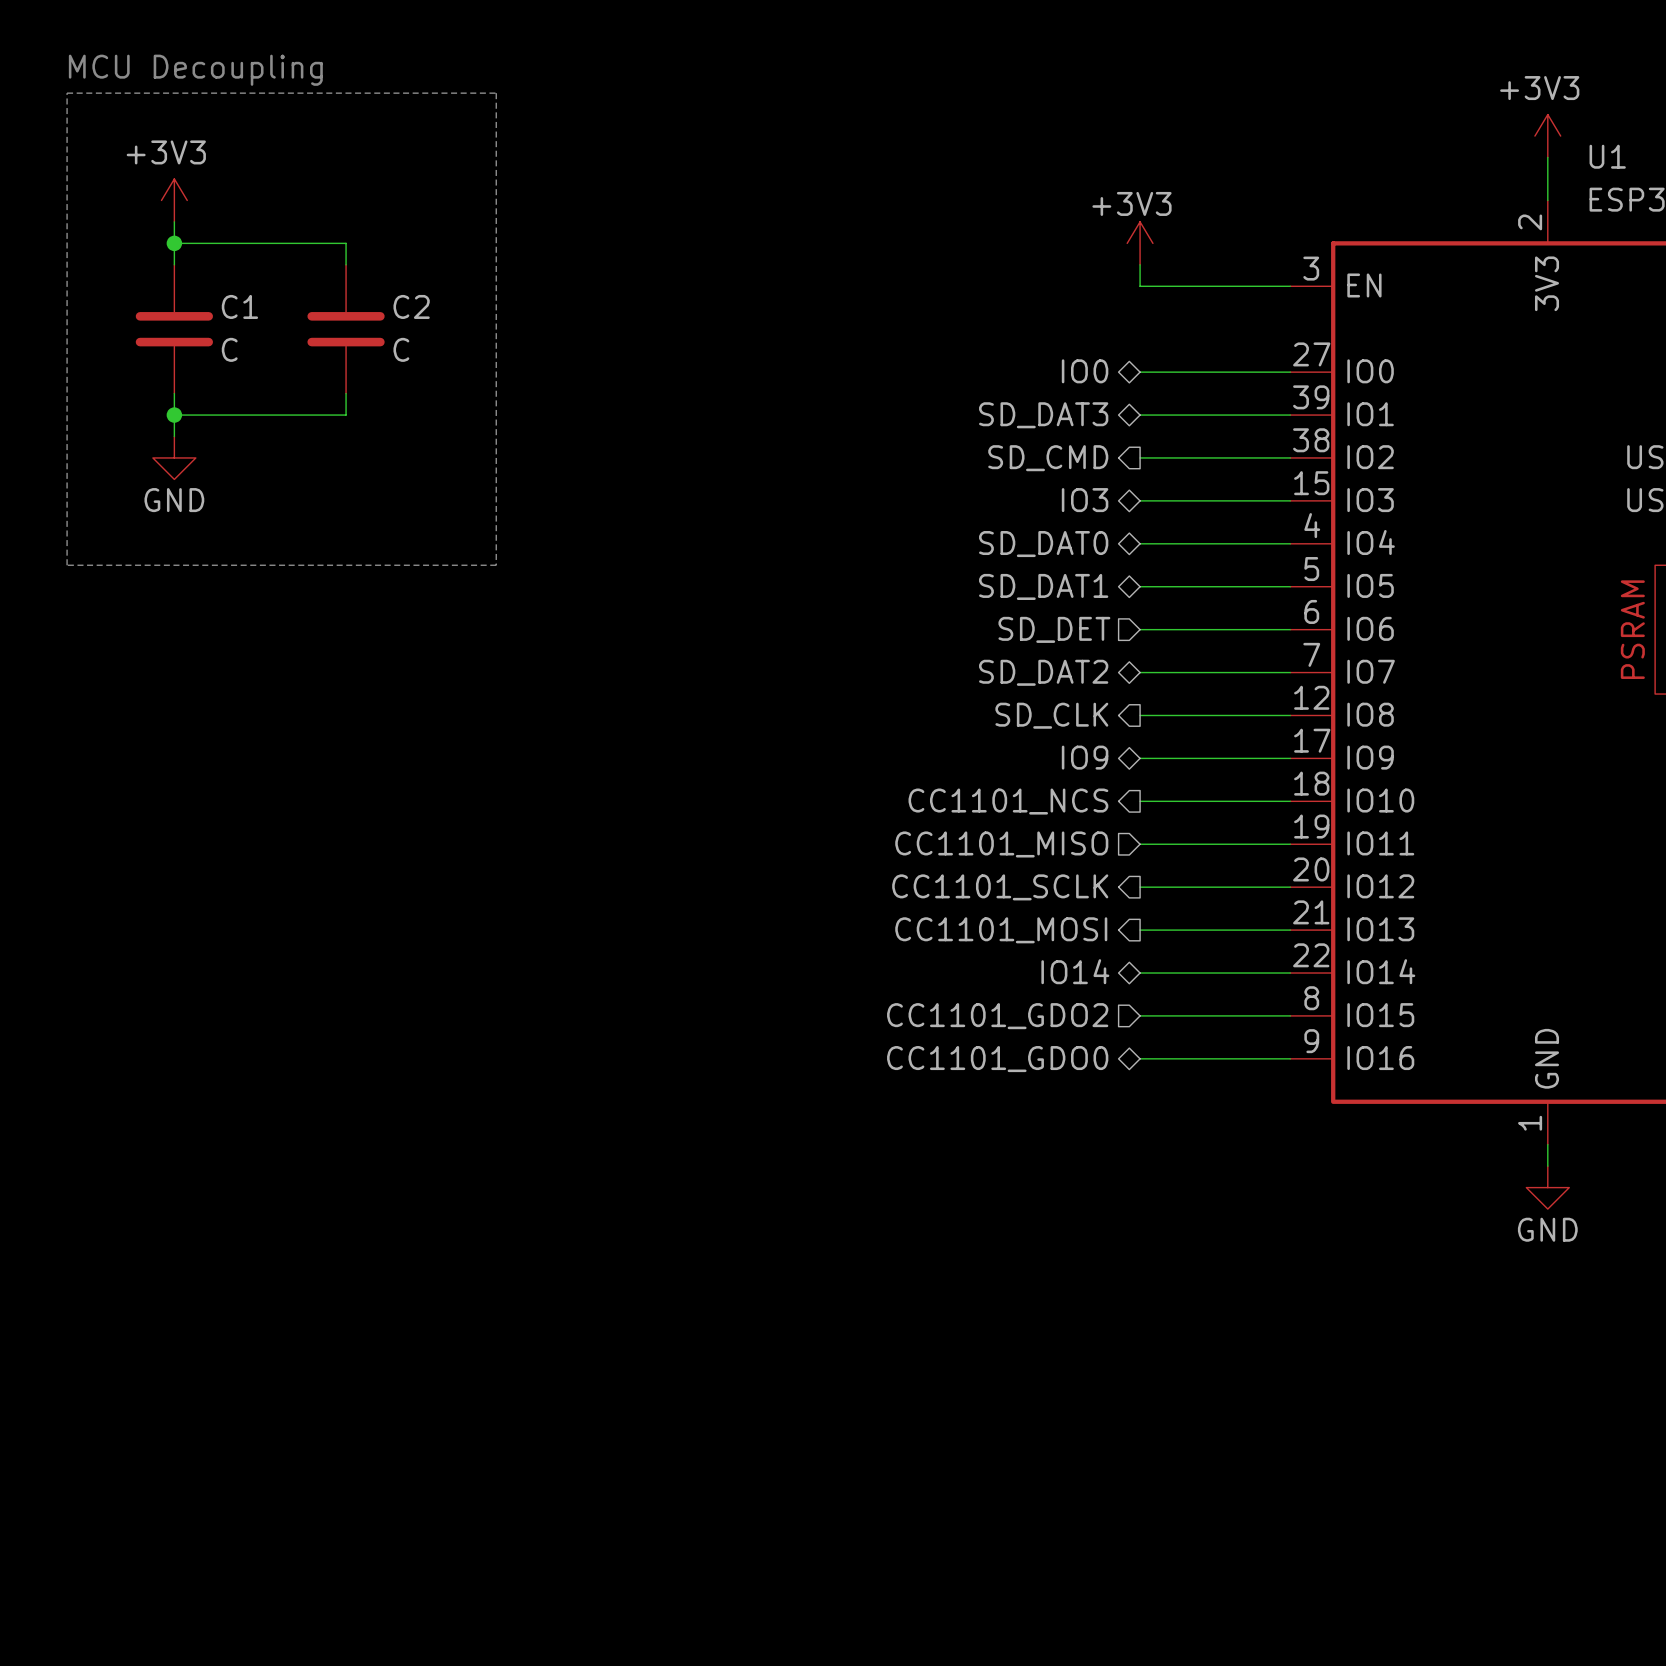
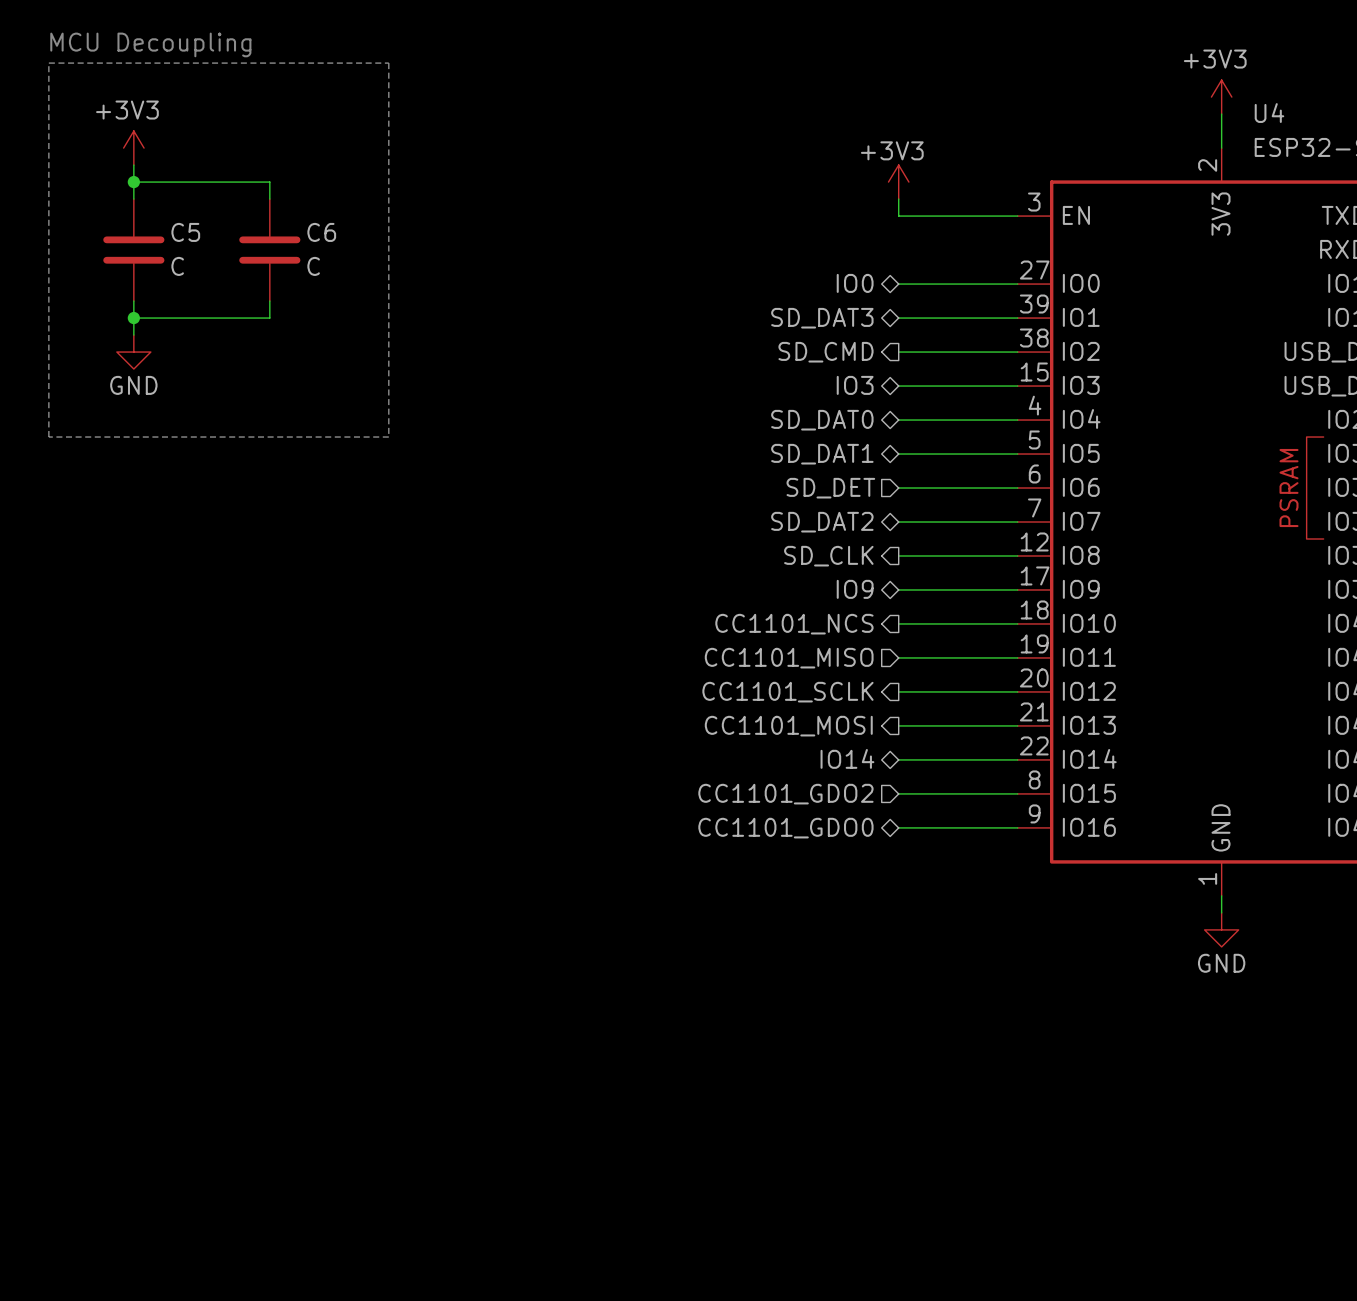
U1 name: U1 (1607, 156) -> U4 (1269, 113)
C1 name: C1 (239, 306) -> C5 (185, 232)
C2 name: C2 (411, 306) -> C6 (321, 232)

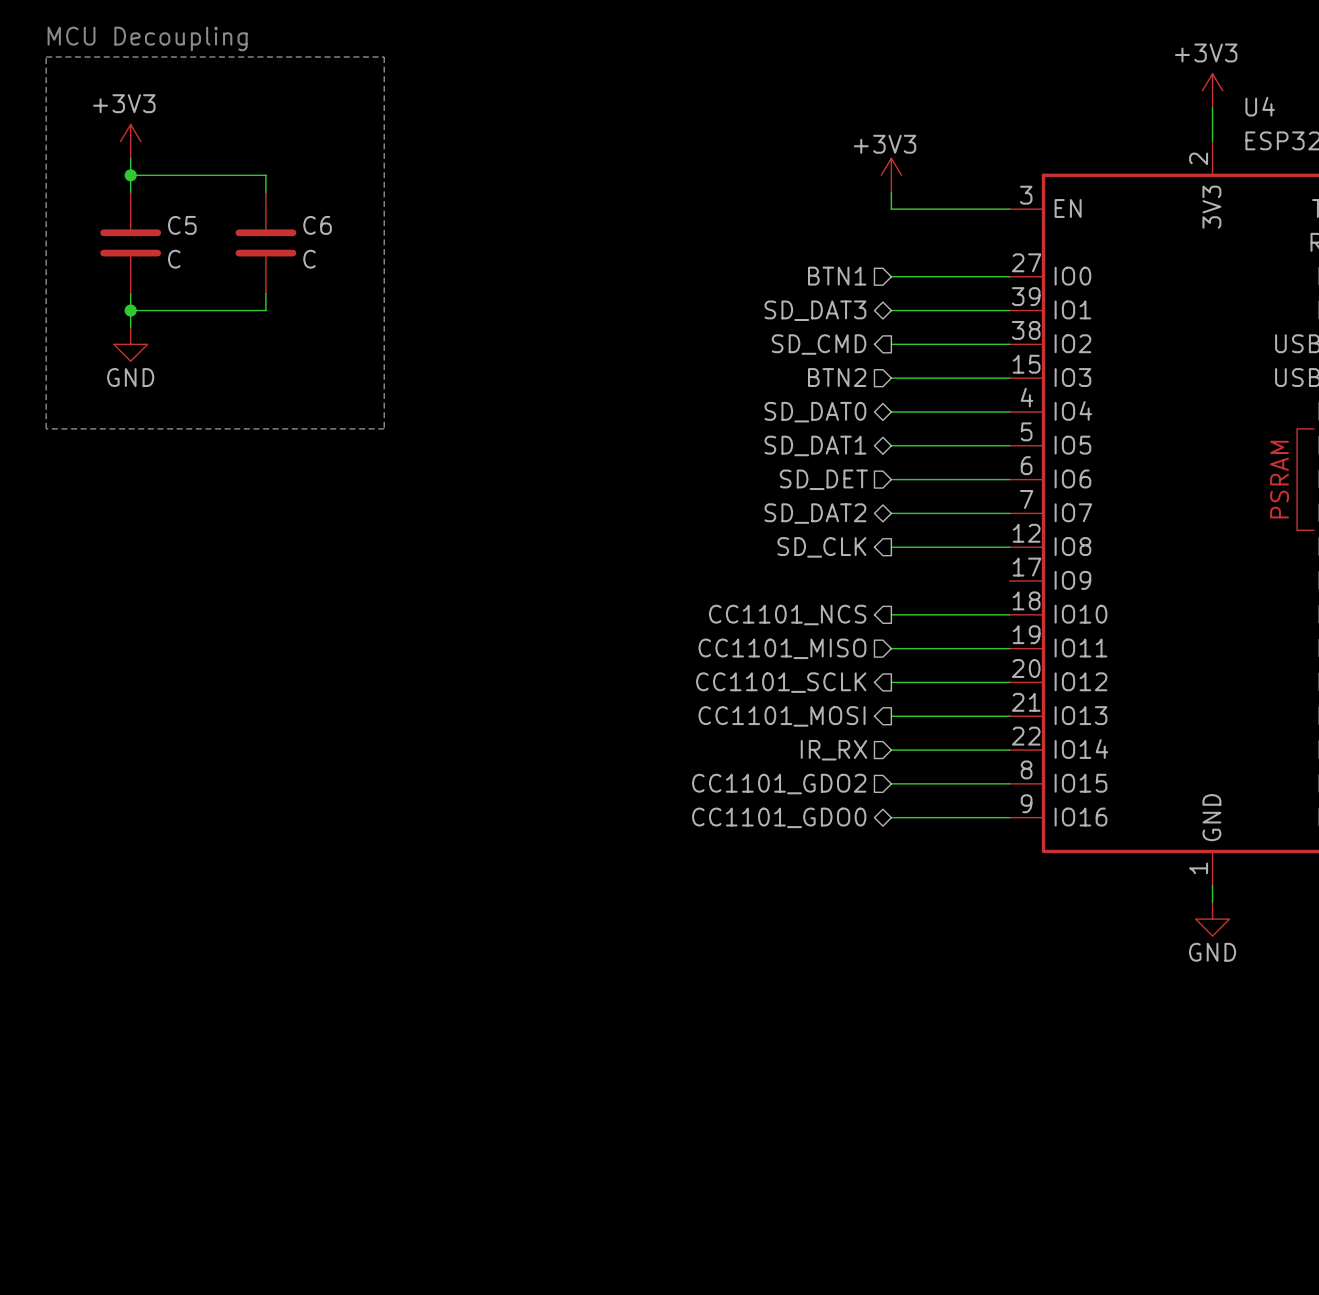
hierarchical label shape: bidirectional (855, 283) -> input (837, 276)
hierarchical label: IO0 (855, 283) -> BTN1 (837, 276)
hierarchical label shape: bidirectional (855, 385) -> input (837, 377)
hierarchical label: IO3 (855, 385) -> BTN2 (837, 377)
hierarchical label: IO9 (855, 589) -> none
wire: (898, 589) (1017, 589) -> none
hierarchical label shape: bidirectional (847, 758) -> input (833, 750)
hierarchical label: IO14 (847, 758) -> IR_RX (833, 750)

